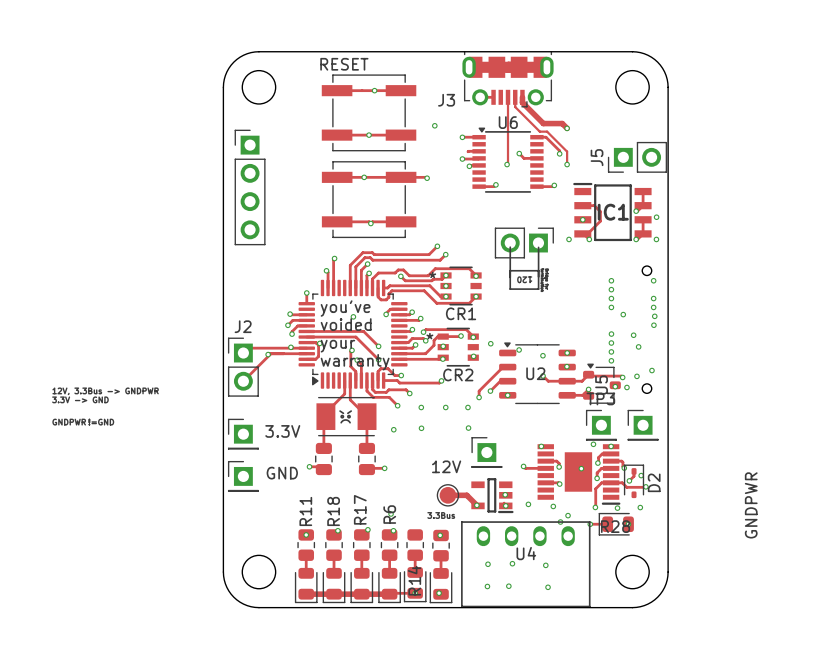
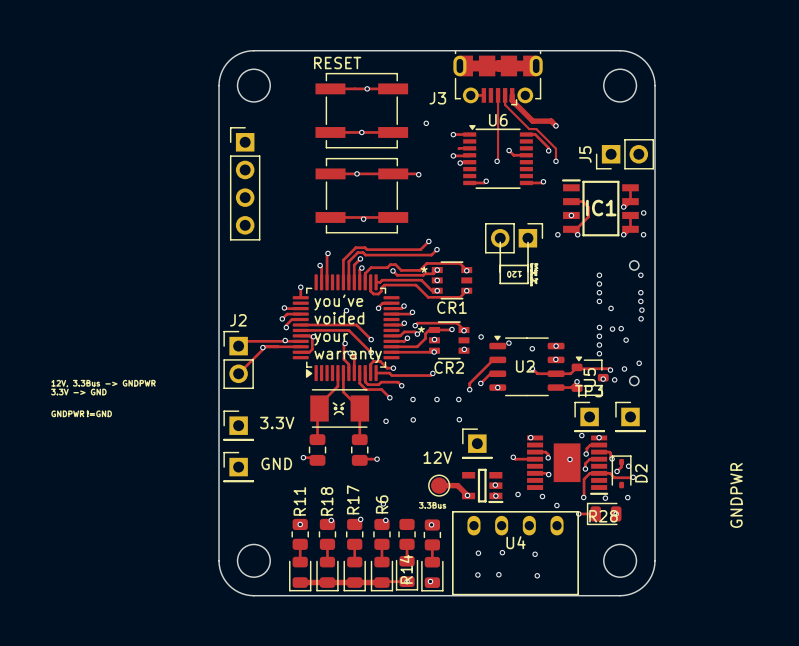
via: none -> (612, 329)
via: (560, 522) -> none

